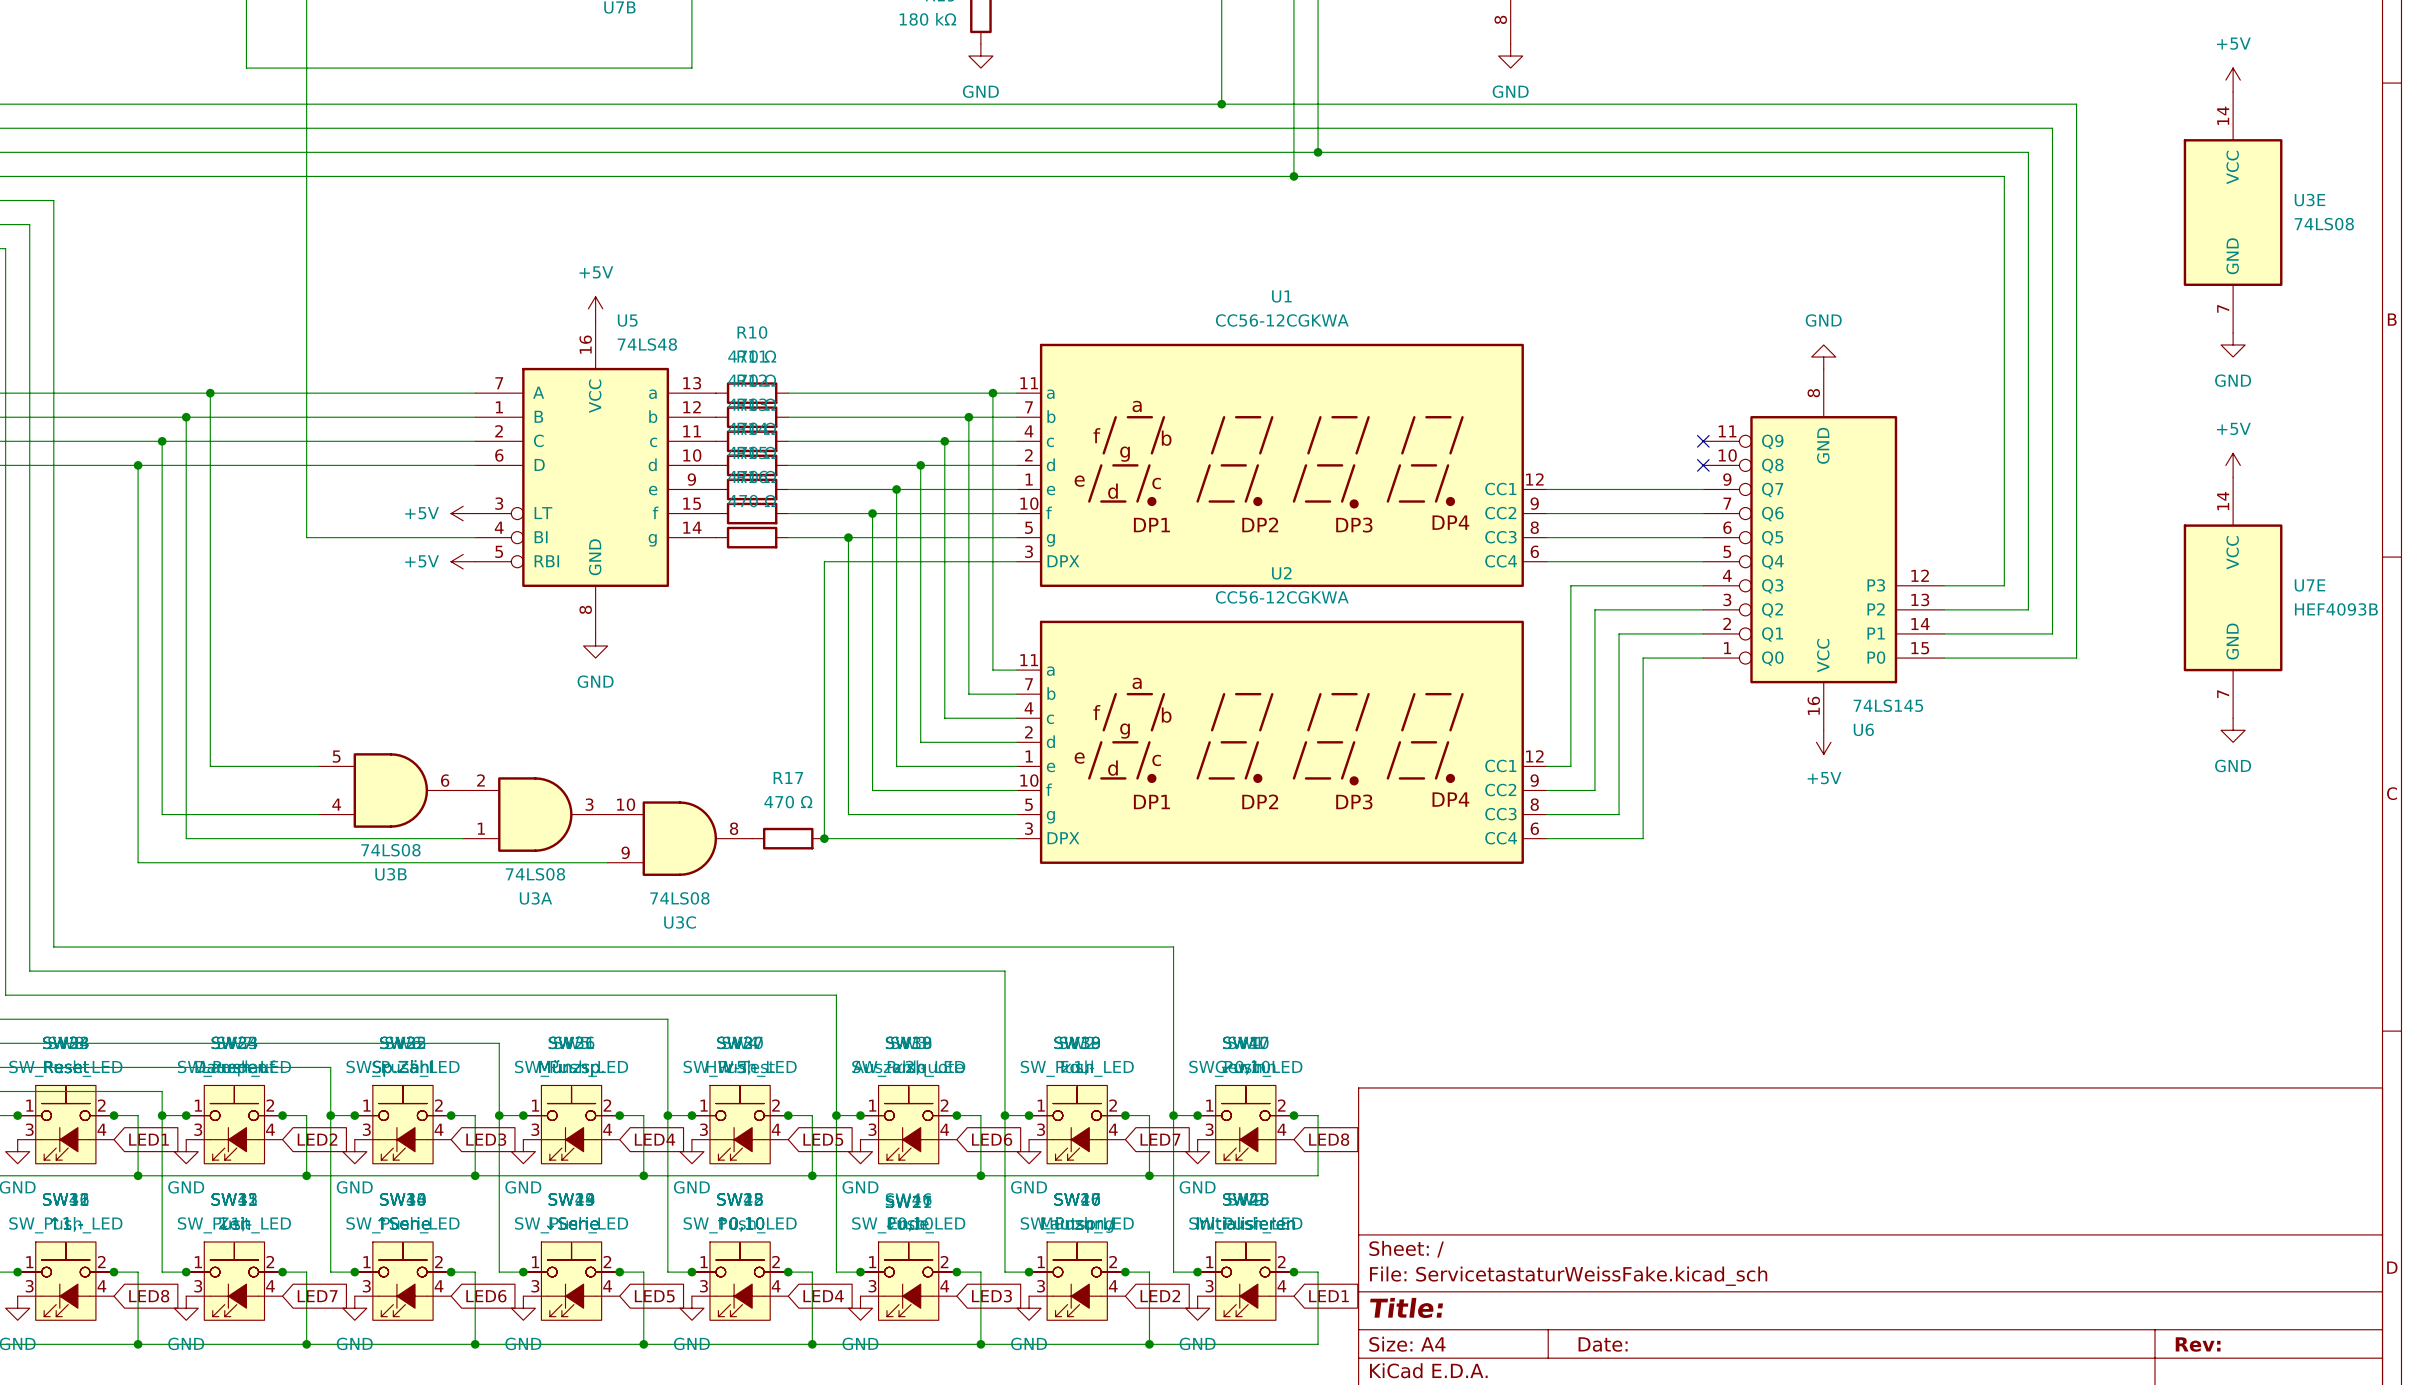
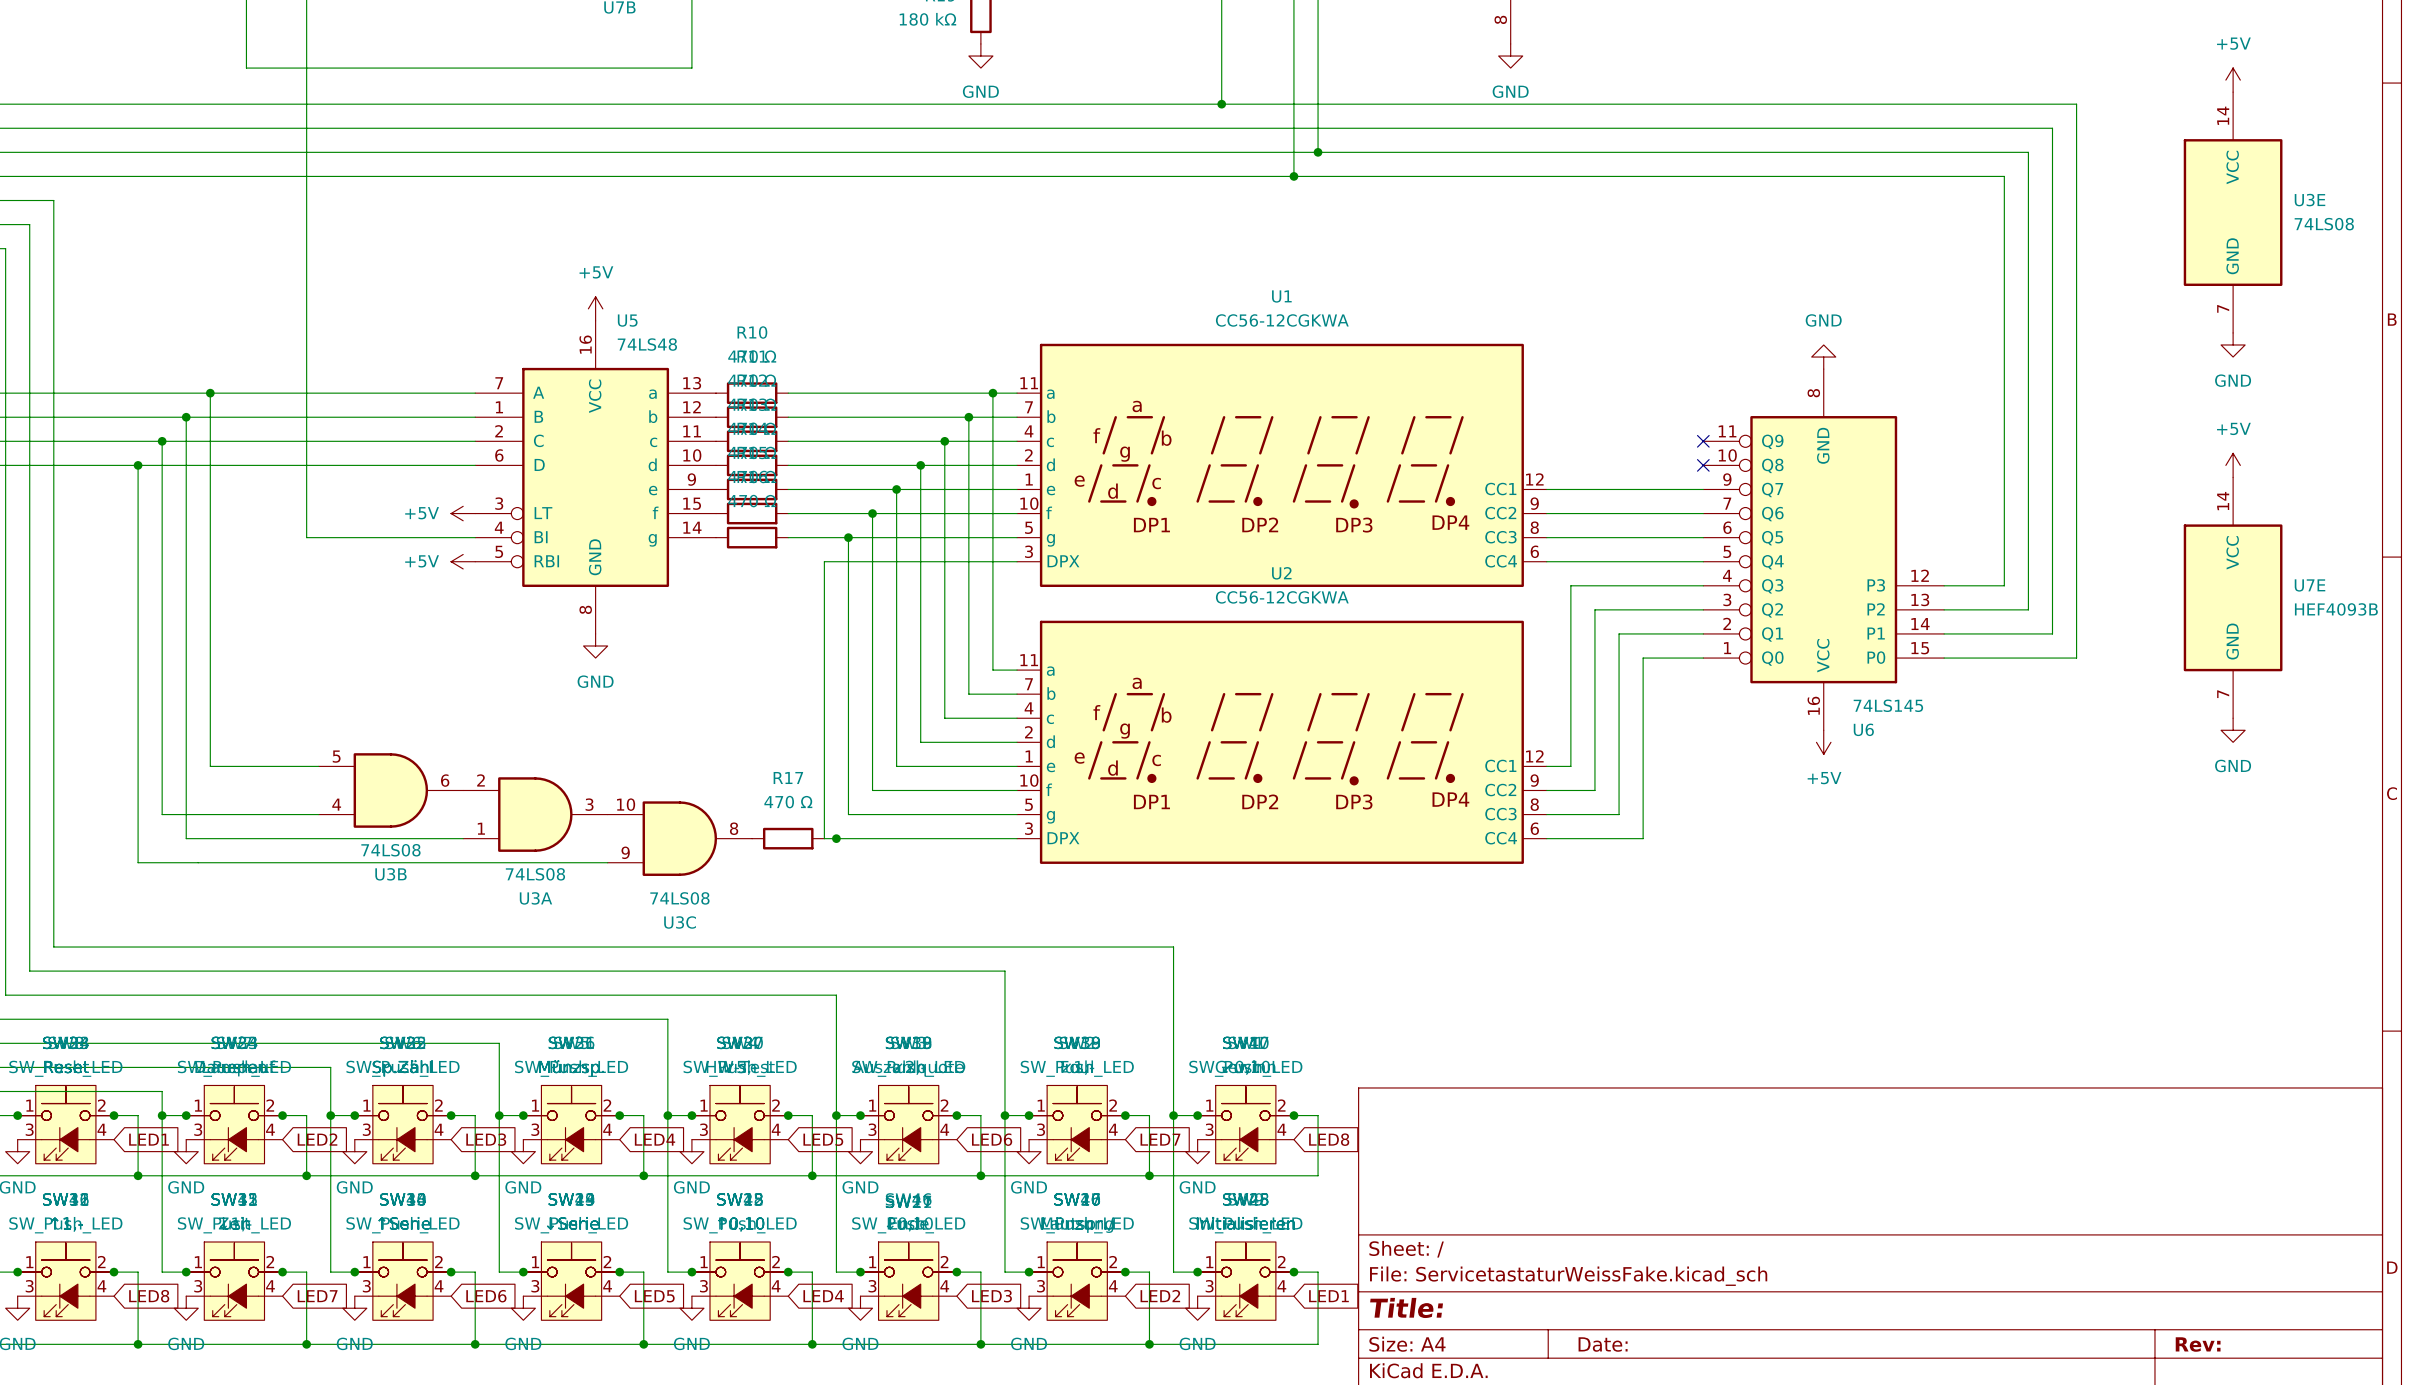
junction position: (824, 838) -> (836, 838)

